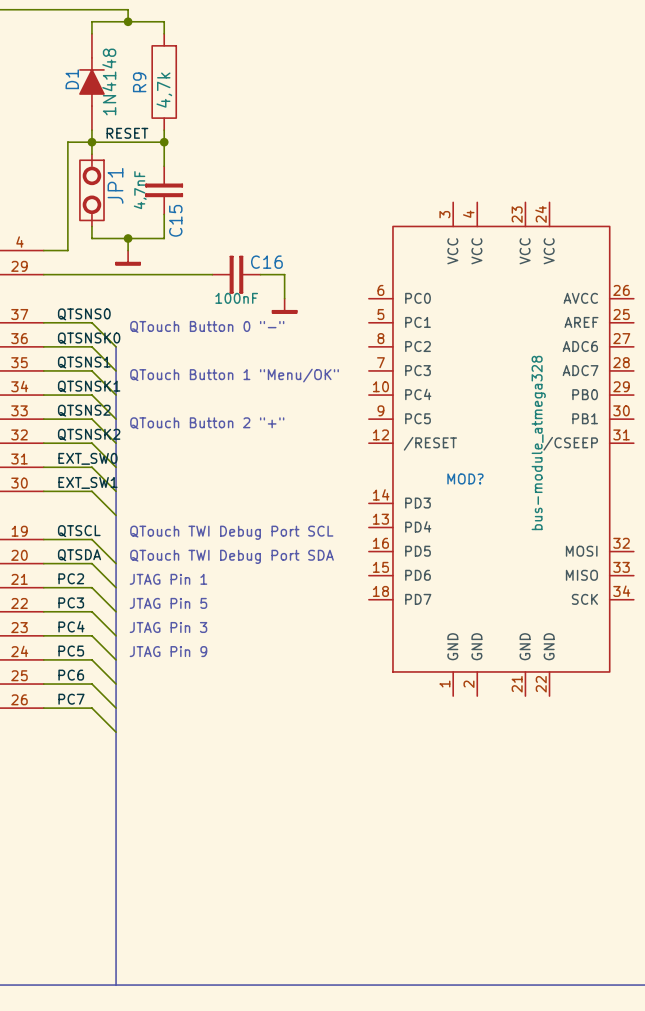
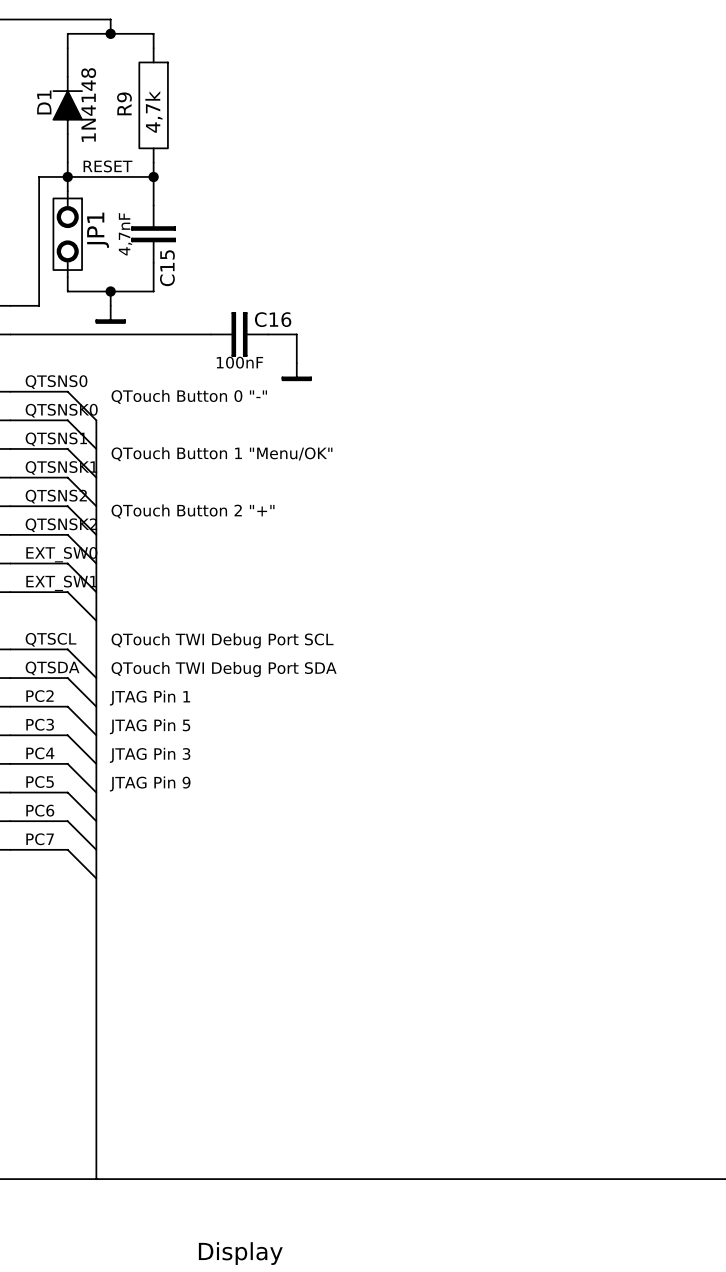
MOD?: bus-module_atmega328 (501, 449) -> none

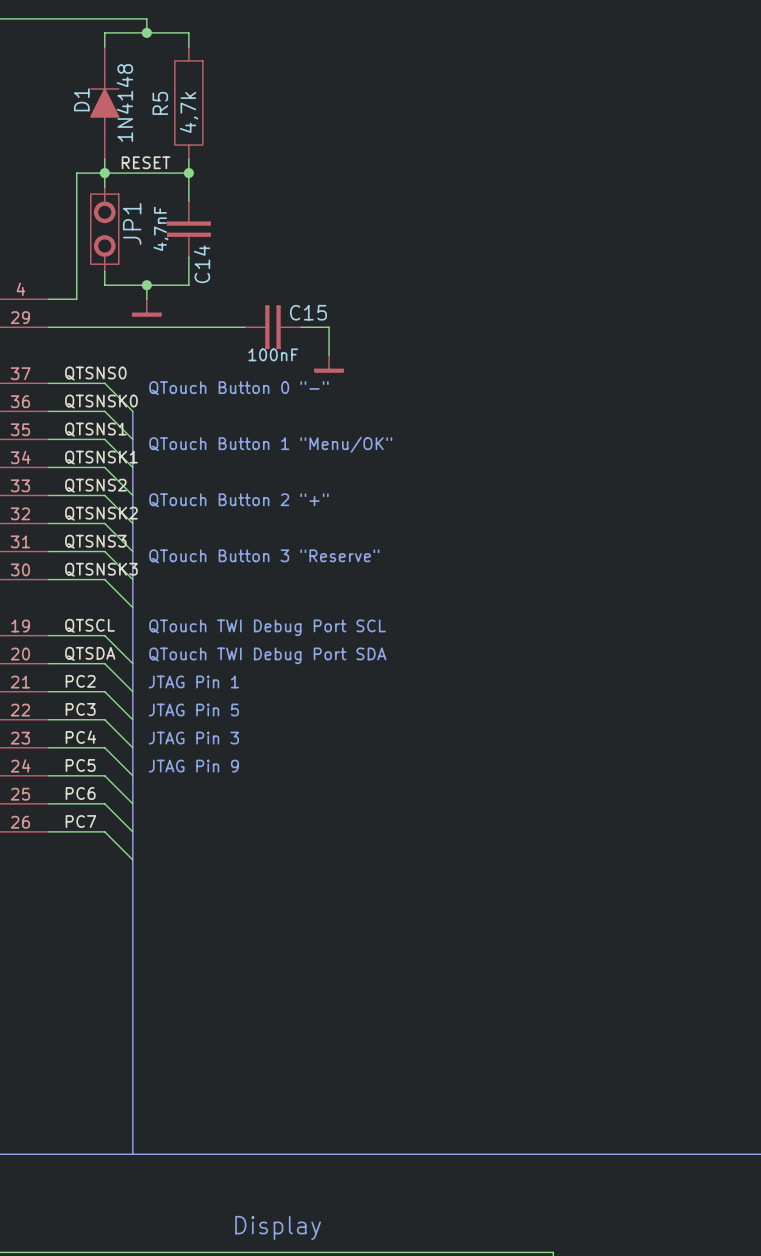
R9 name: R9 (124, 103) -> R5 (160, 103)
C15 name: C15 (167, 268) -> C14 (202, 264)
C16 name: C16 (273, 319) -> C15 (308, 312)
label: EXT_SW0 (61, 554) -> QTSNS3 (95, 541)
text: none -> QTouch Button 3 "Reserve" (264, 556)
label: EXT_SW1 (61, 583) -> QTSNSK3 (101, 569)

